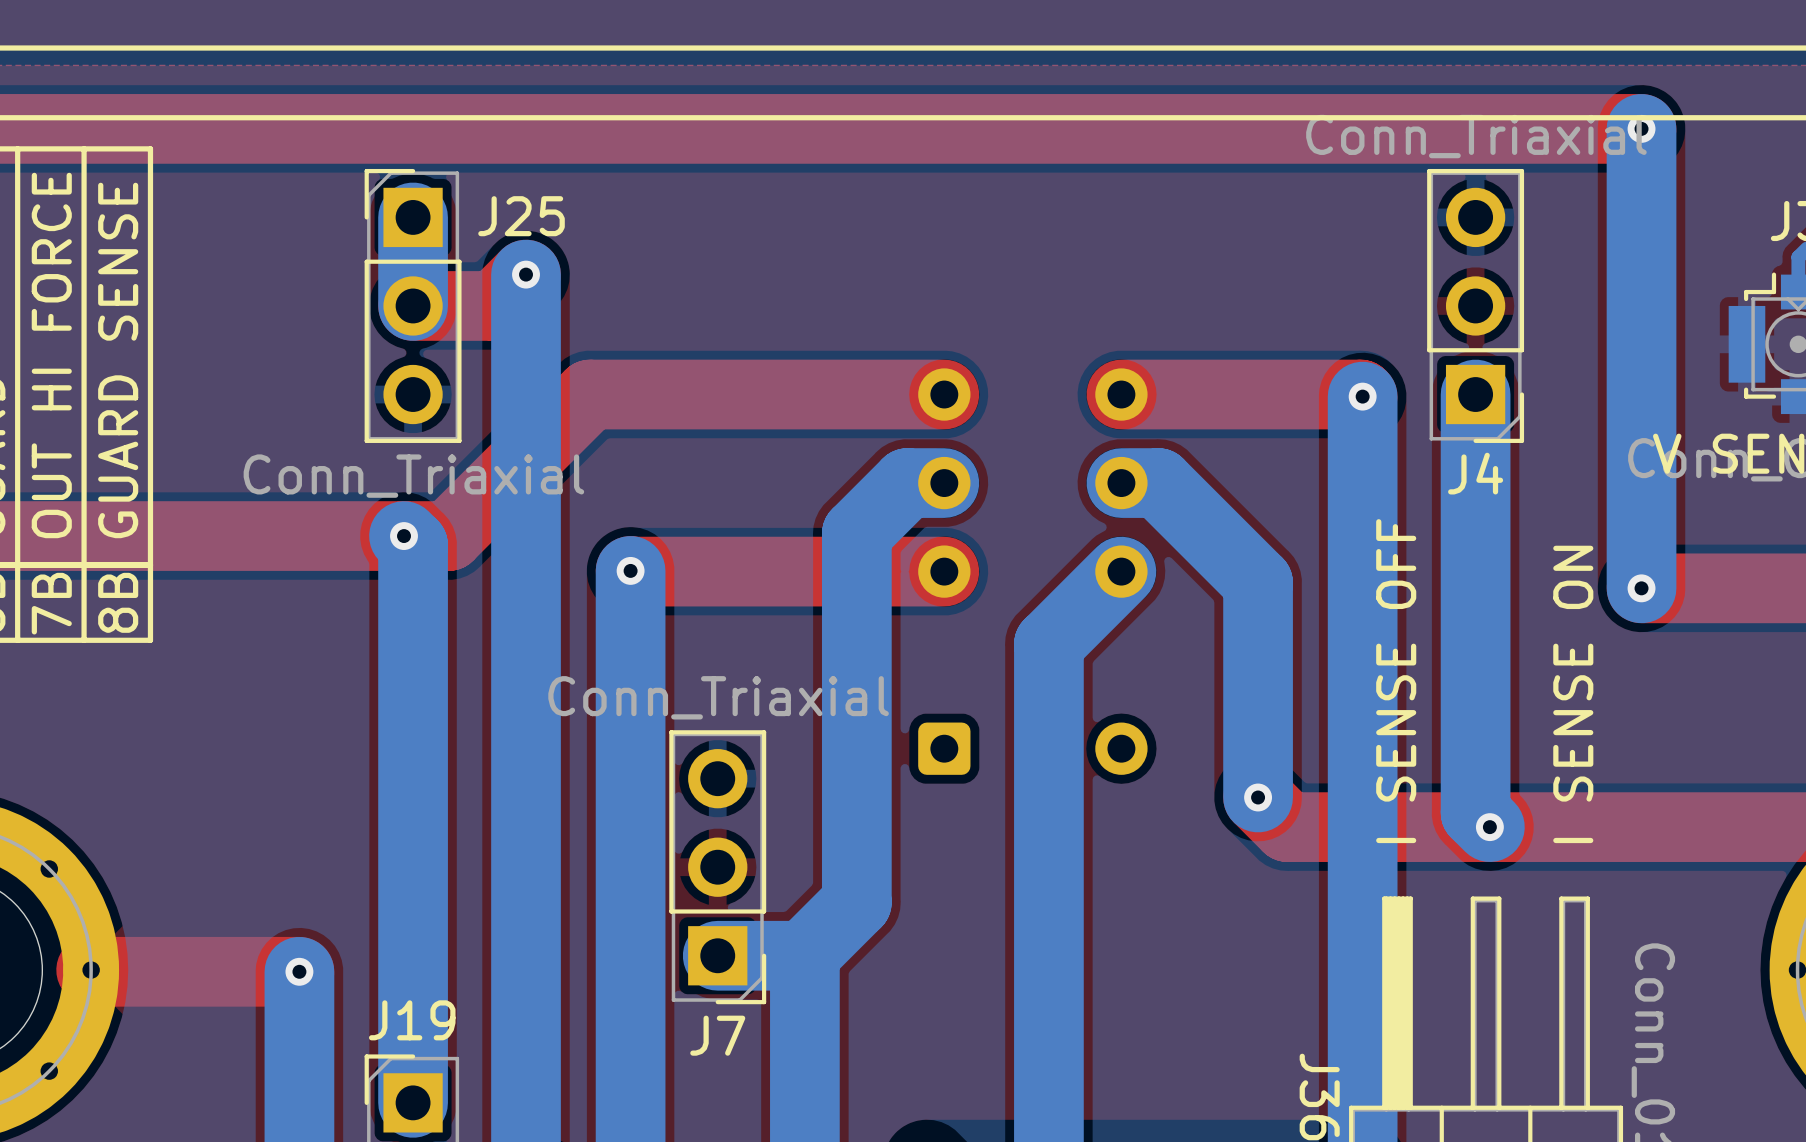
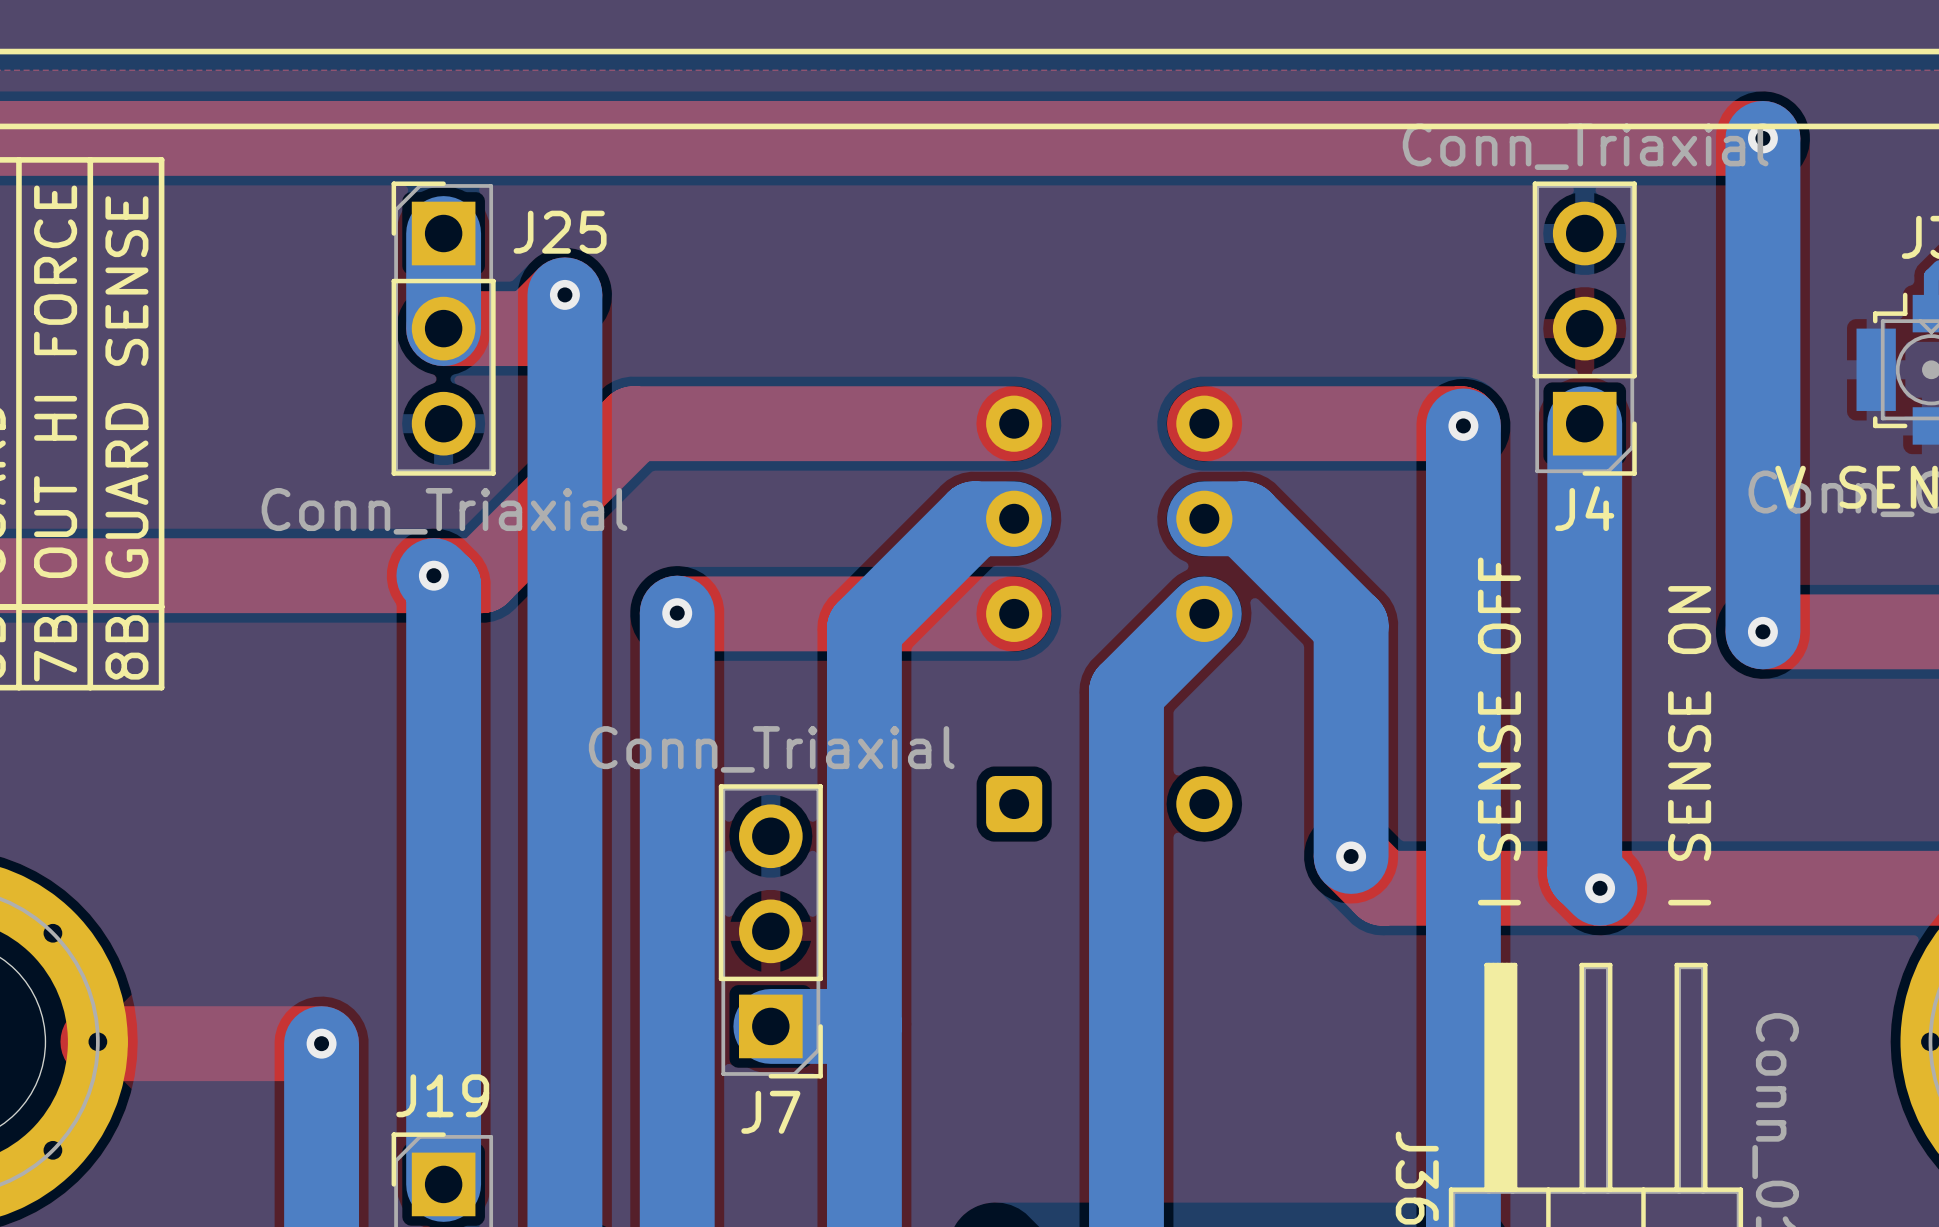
bottom track: (856, 533) (856, 902) (804, 954) -> (920, 573) (864, 628) (864, 1024)

